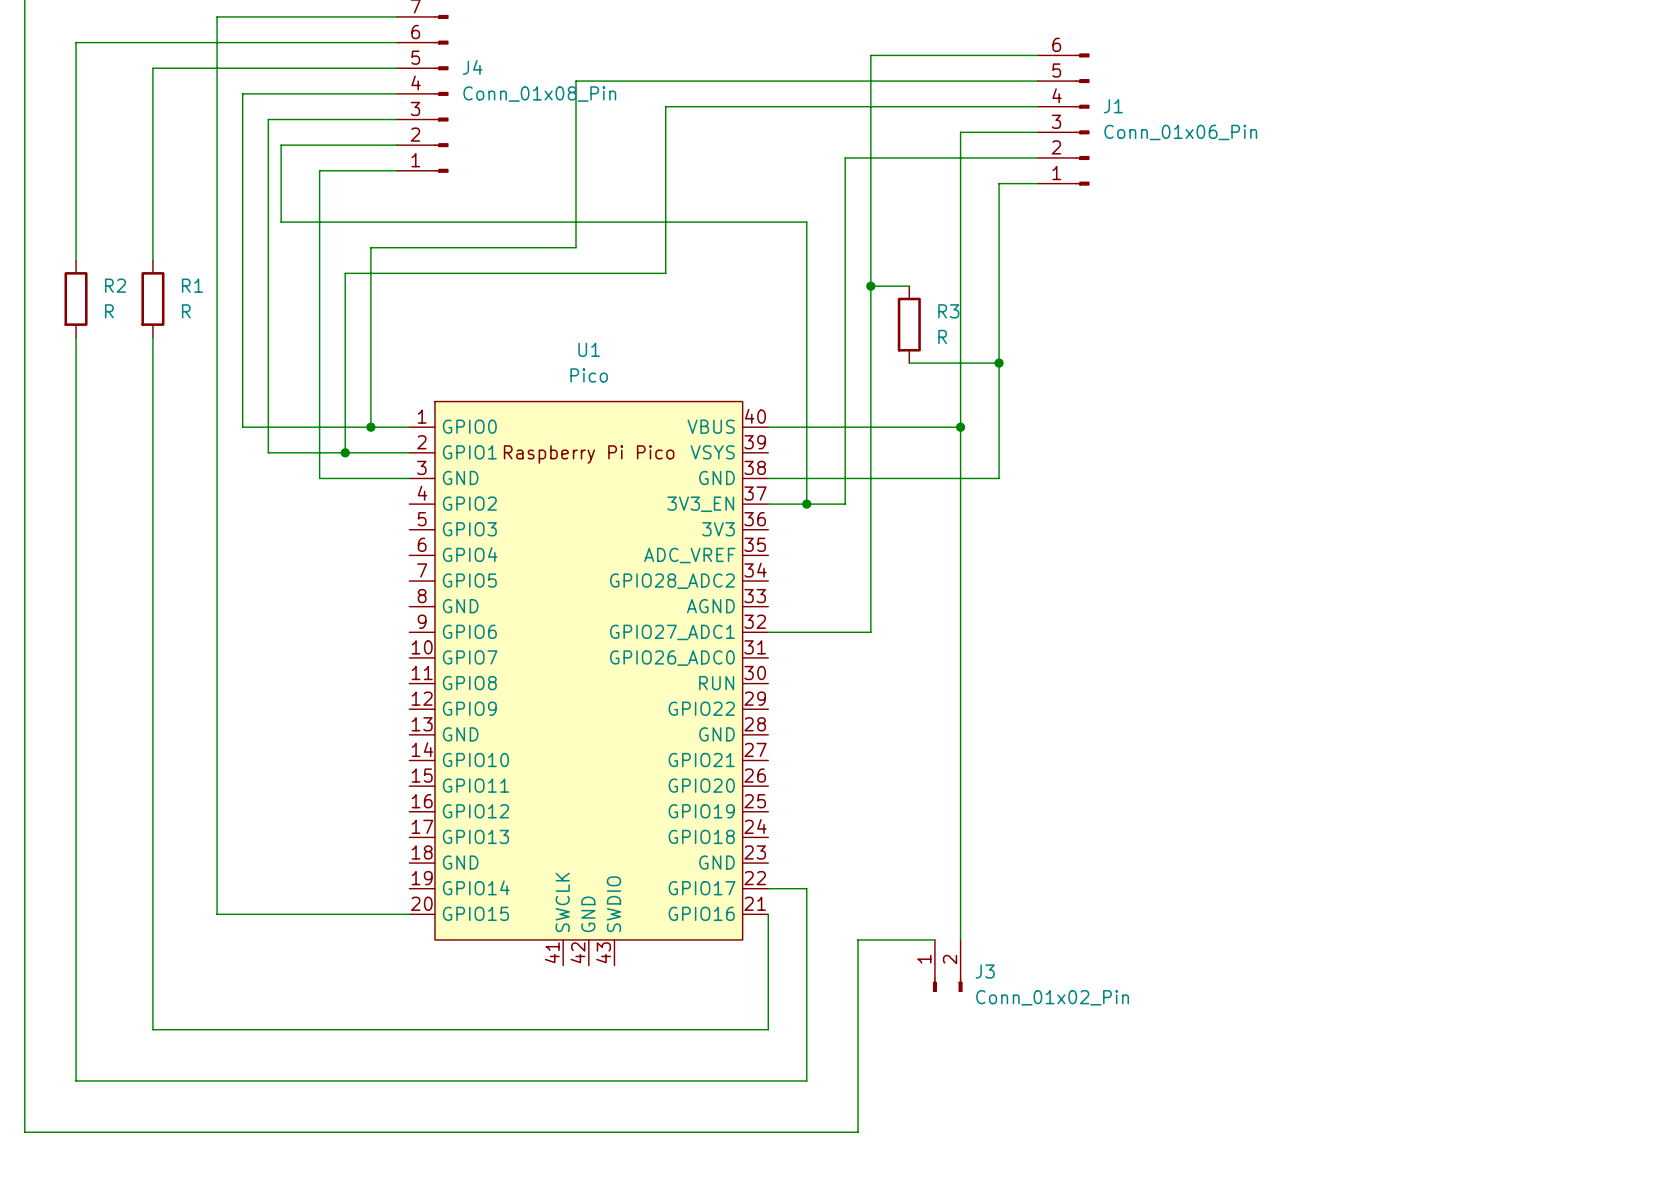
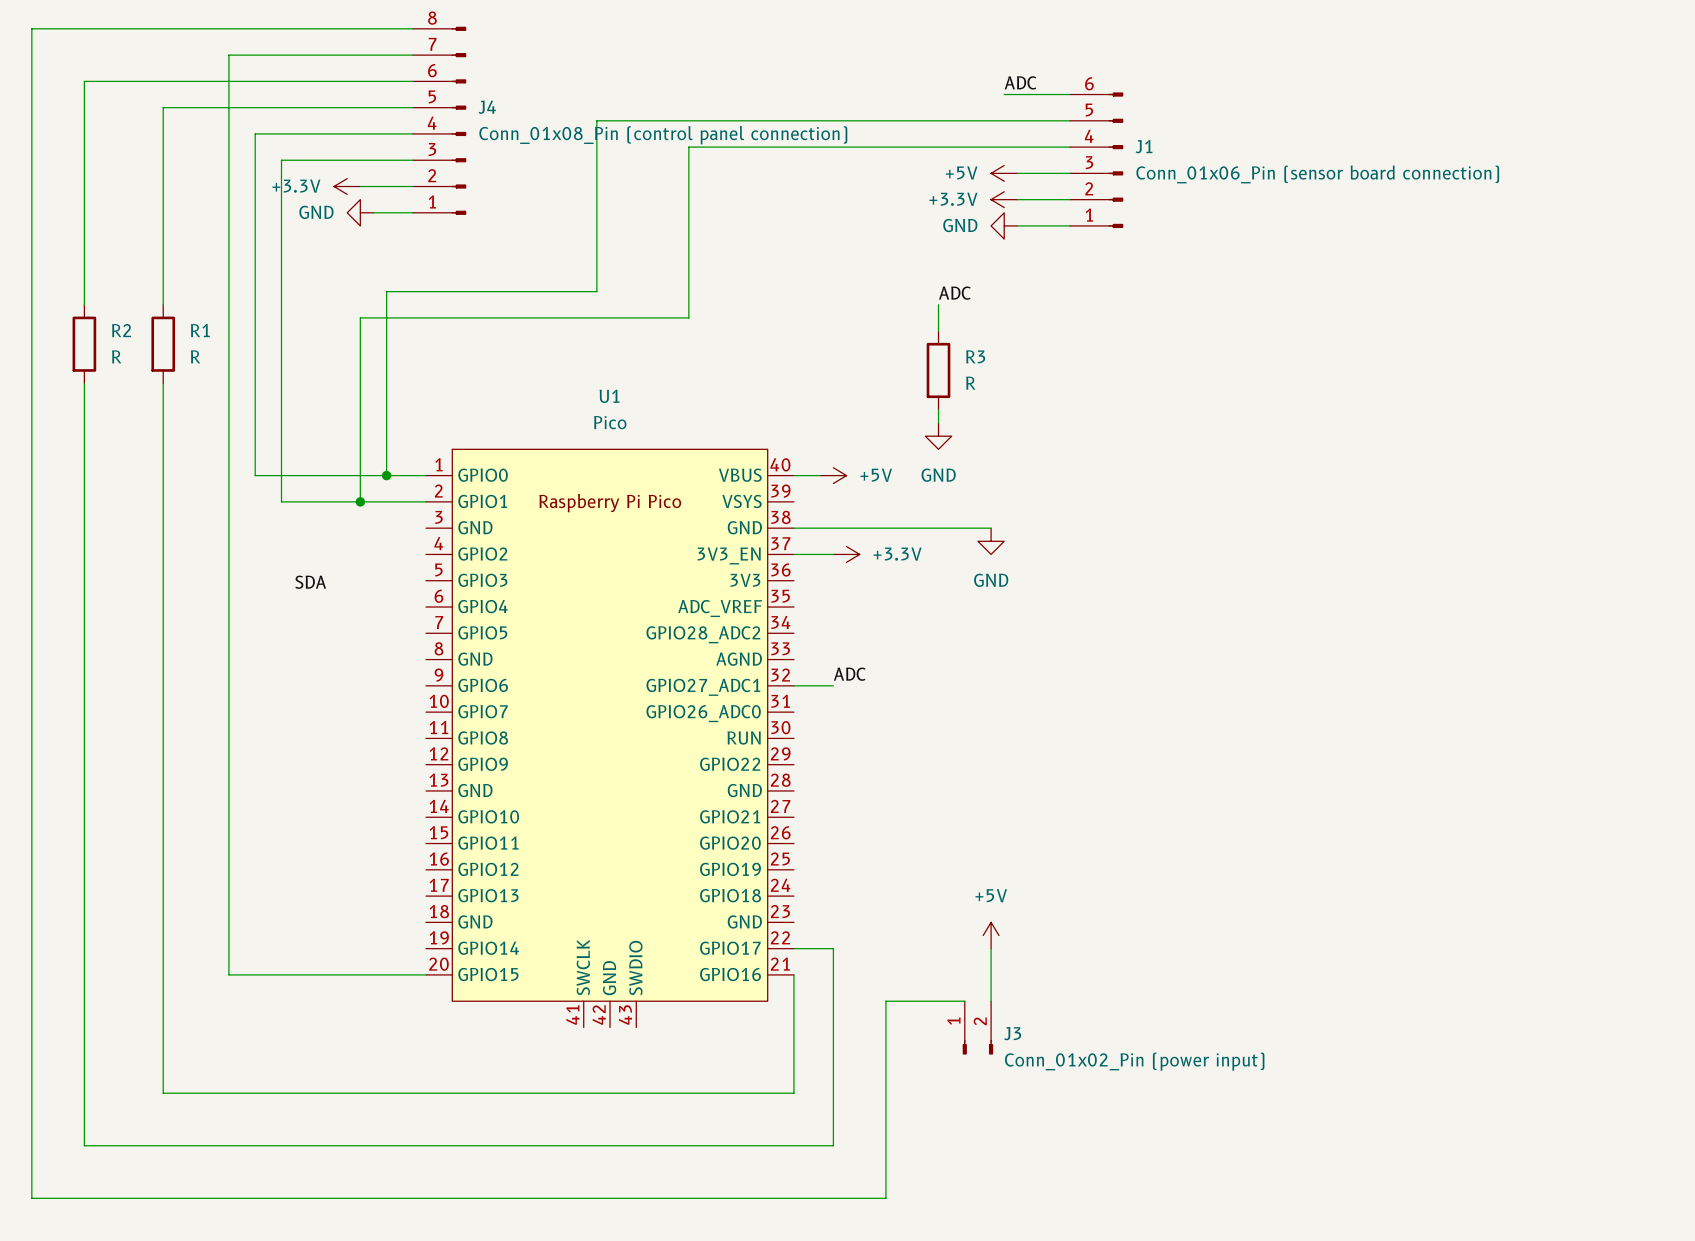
label: none -> ADC (1020, 82)
wire: (973, 55) (870, 55) (870, 632) (806, 632) -> none
J4 value: Conn_01x08_Pin (539, 94) -> Conn_01x08_Pin (control panel connection) (663, 135)
power symbol: none -> +5V (1004, 173)
wire: (986, 132) (960, 132) (960, 888) -> none
J1 value: Conn_01x06_Pin (1180, 132) -> Conn_01x06_Pin (sensor board connection) (1317, 174)
power symbol: none -> +3.3V (347, 186)
wire: (345, 145) (281, 145) (281, 222) (806, 222) (806, 504) (845, 504) (845, 157) (986, 157) -> none
power symbol: none -> +3.3V (1004, 199)
power symbol: none -> GND (360, 212)
wire: (358, 170) (319, 170) (319, 478) (409, 478) -> none
power symbol: none -> GND (1004, 225)
wire: (999, 183) (999, 478) (960, 478) -> (1030, 225) (1017, 225)
label: none -> ADC (954, 293)
wire: (870, 286) (909, 286) -> (938, 304) (938, 331)
junction: (870, 286) -> none
wire: (909, 363) (999, 363) -> (938, 409) (938, 423)
junction: (999, 363) -> none
power symbol: none -> GND (938, 436)
wire: (793, 427) (960, 427) -> none
power symbol: none -> +5V (833, 475)
junction: (960, 427) -> none
power symbol: none -> GND (991, 541)
junction: (806, 504) -> none
power symbol: none -> +3.3V (846, 554)
label: none -> SDA (310, 582)
label: none -> ADC (849, 674)
power symbol: none -> +5V (991, 935)
J3 value: Conn_01x02_Pin (1052, 997) -> Conn_01x02_Pin (power input) (1134, 1061)

